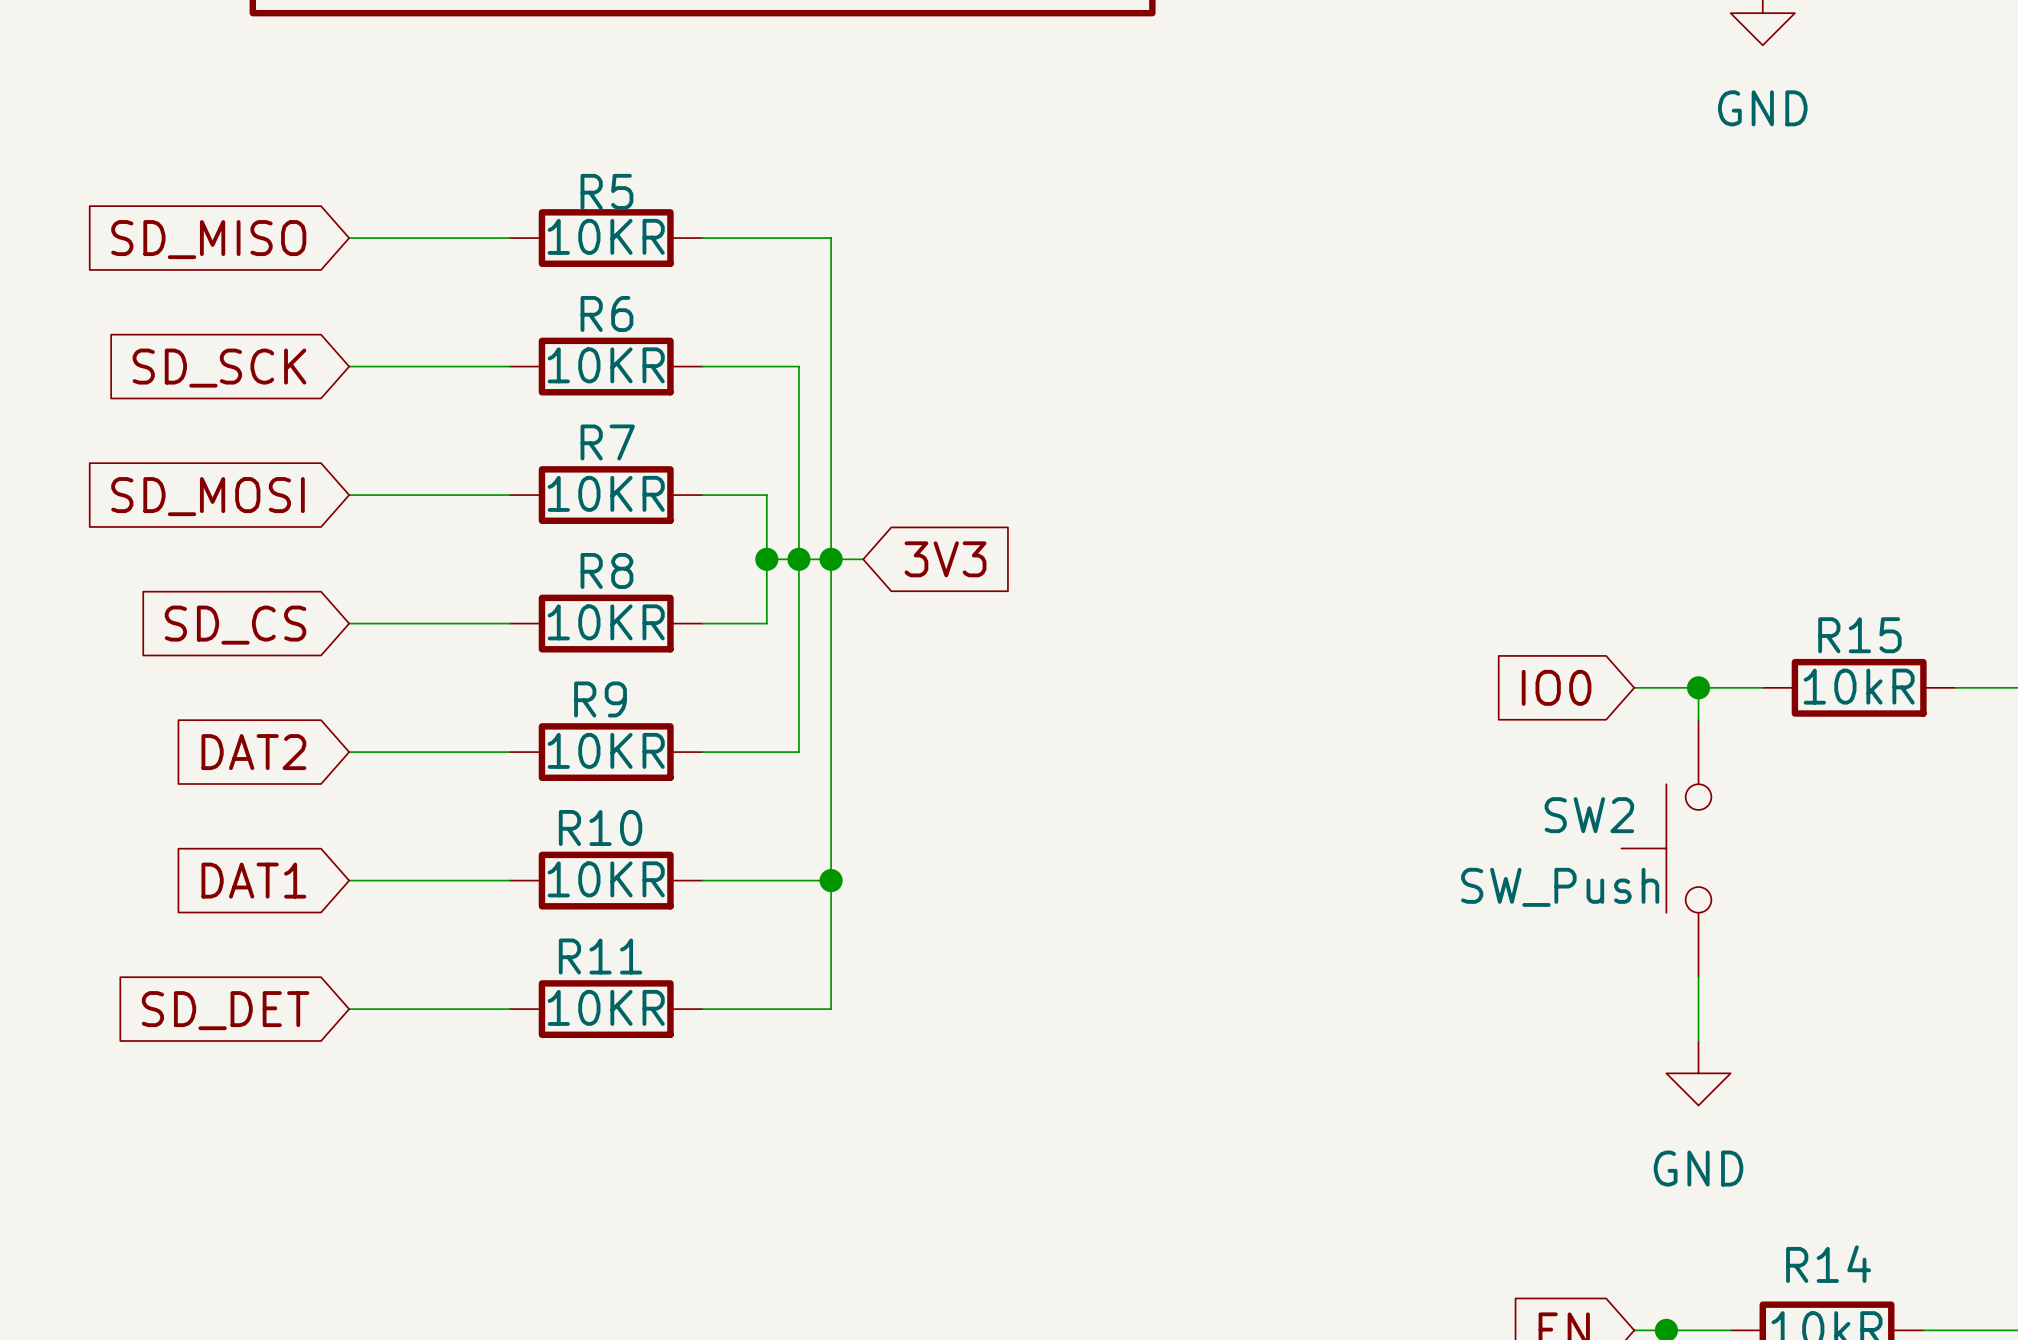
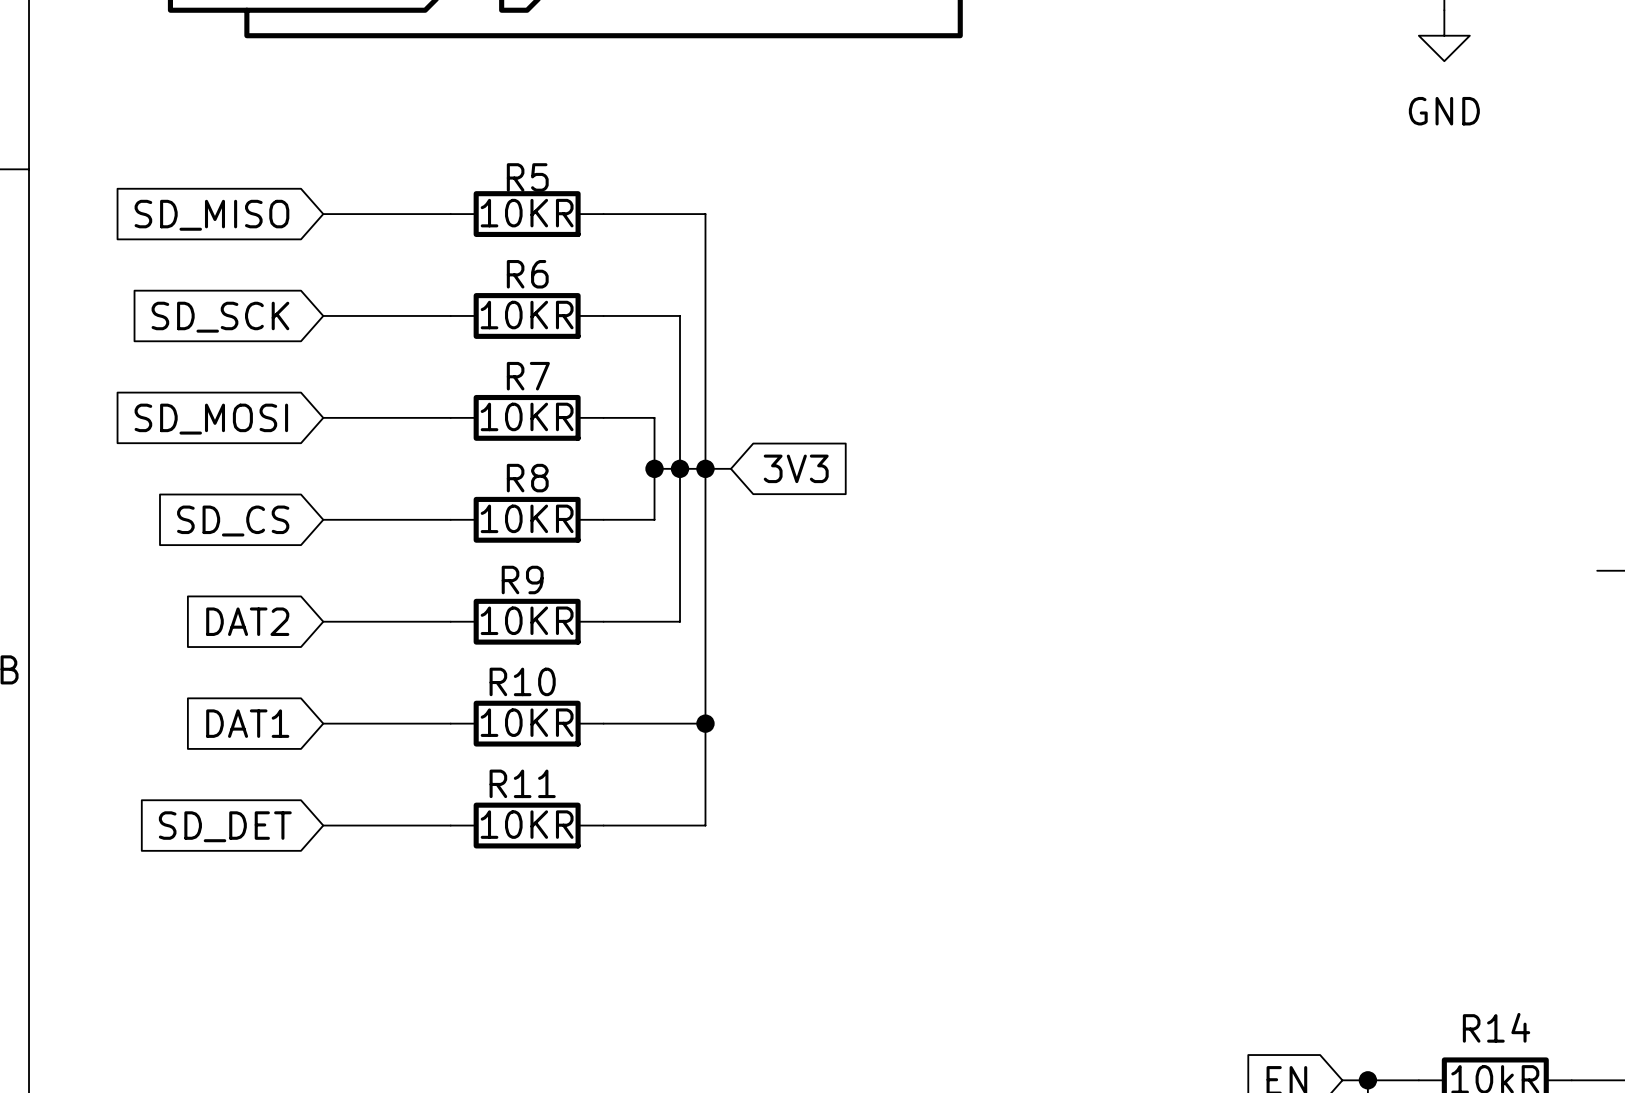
global label: IO0 (1556, 687) -> none
wire: (1634, 687) (1762, 687) -> none
wire: (1698, 687) (1698, 719) -> none
junction: (1698, 687) -> none
R15: 10kR (1859, 687) -> none
SW2: SW_Push (1666, 848) -> none
wire: (1698, 976) (1698, 1041) -> none
power symbol: GND (1698, 1073) -> none

